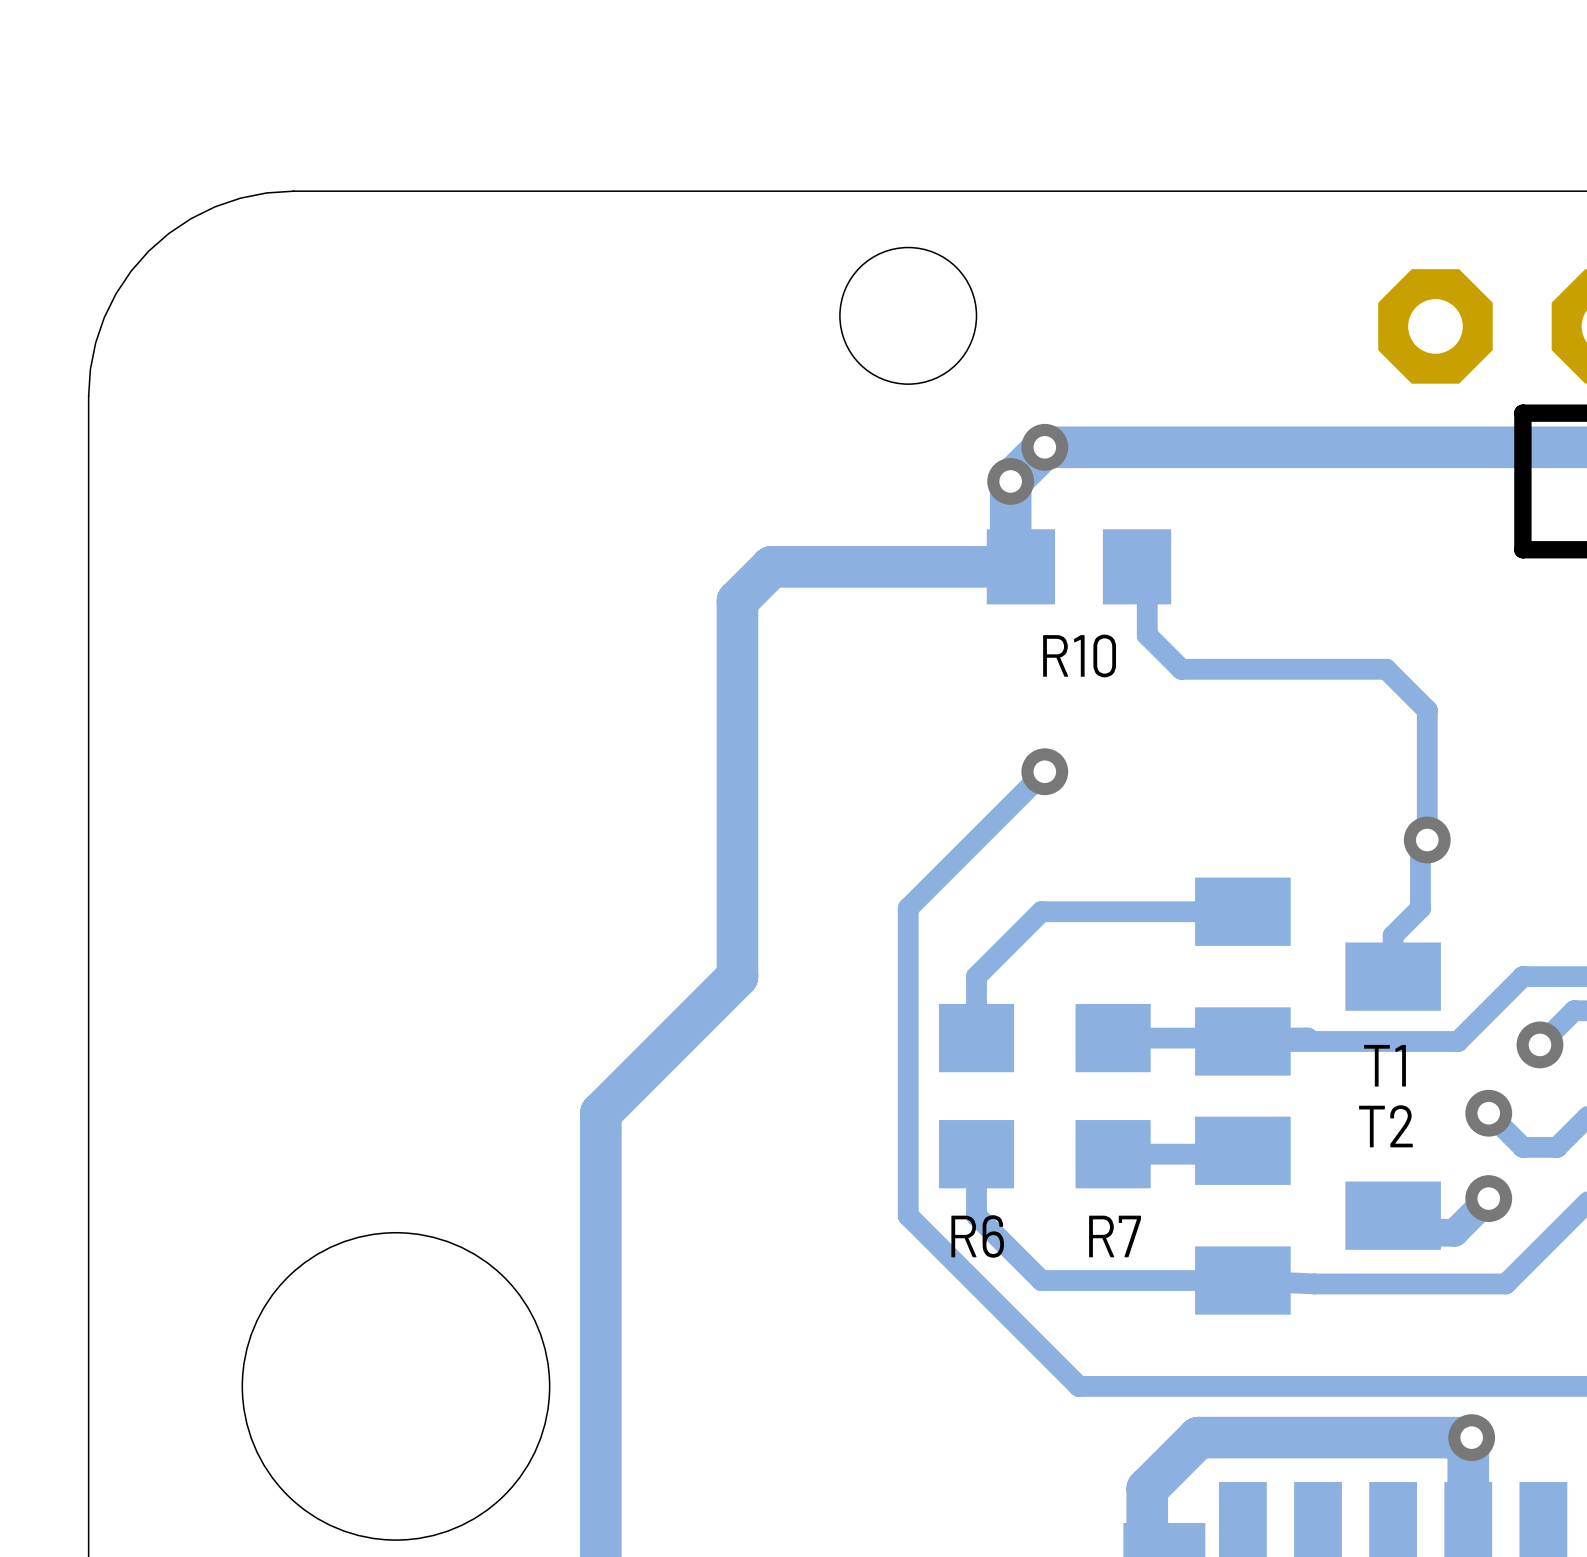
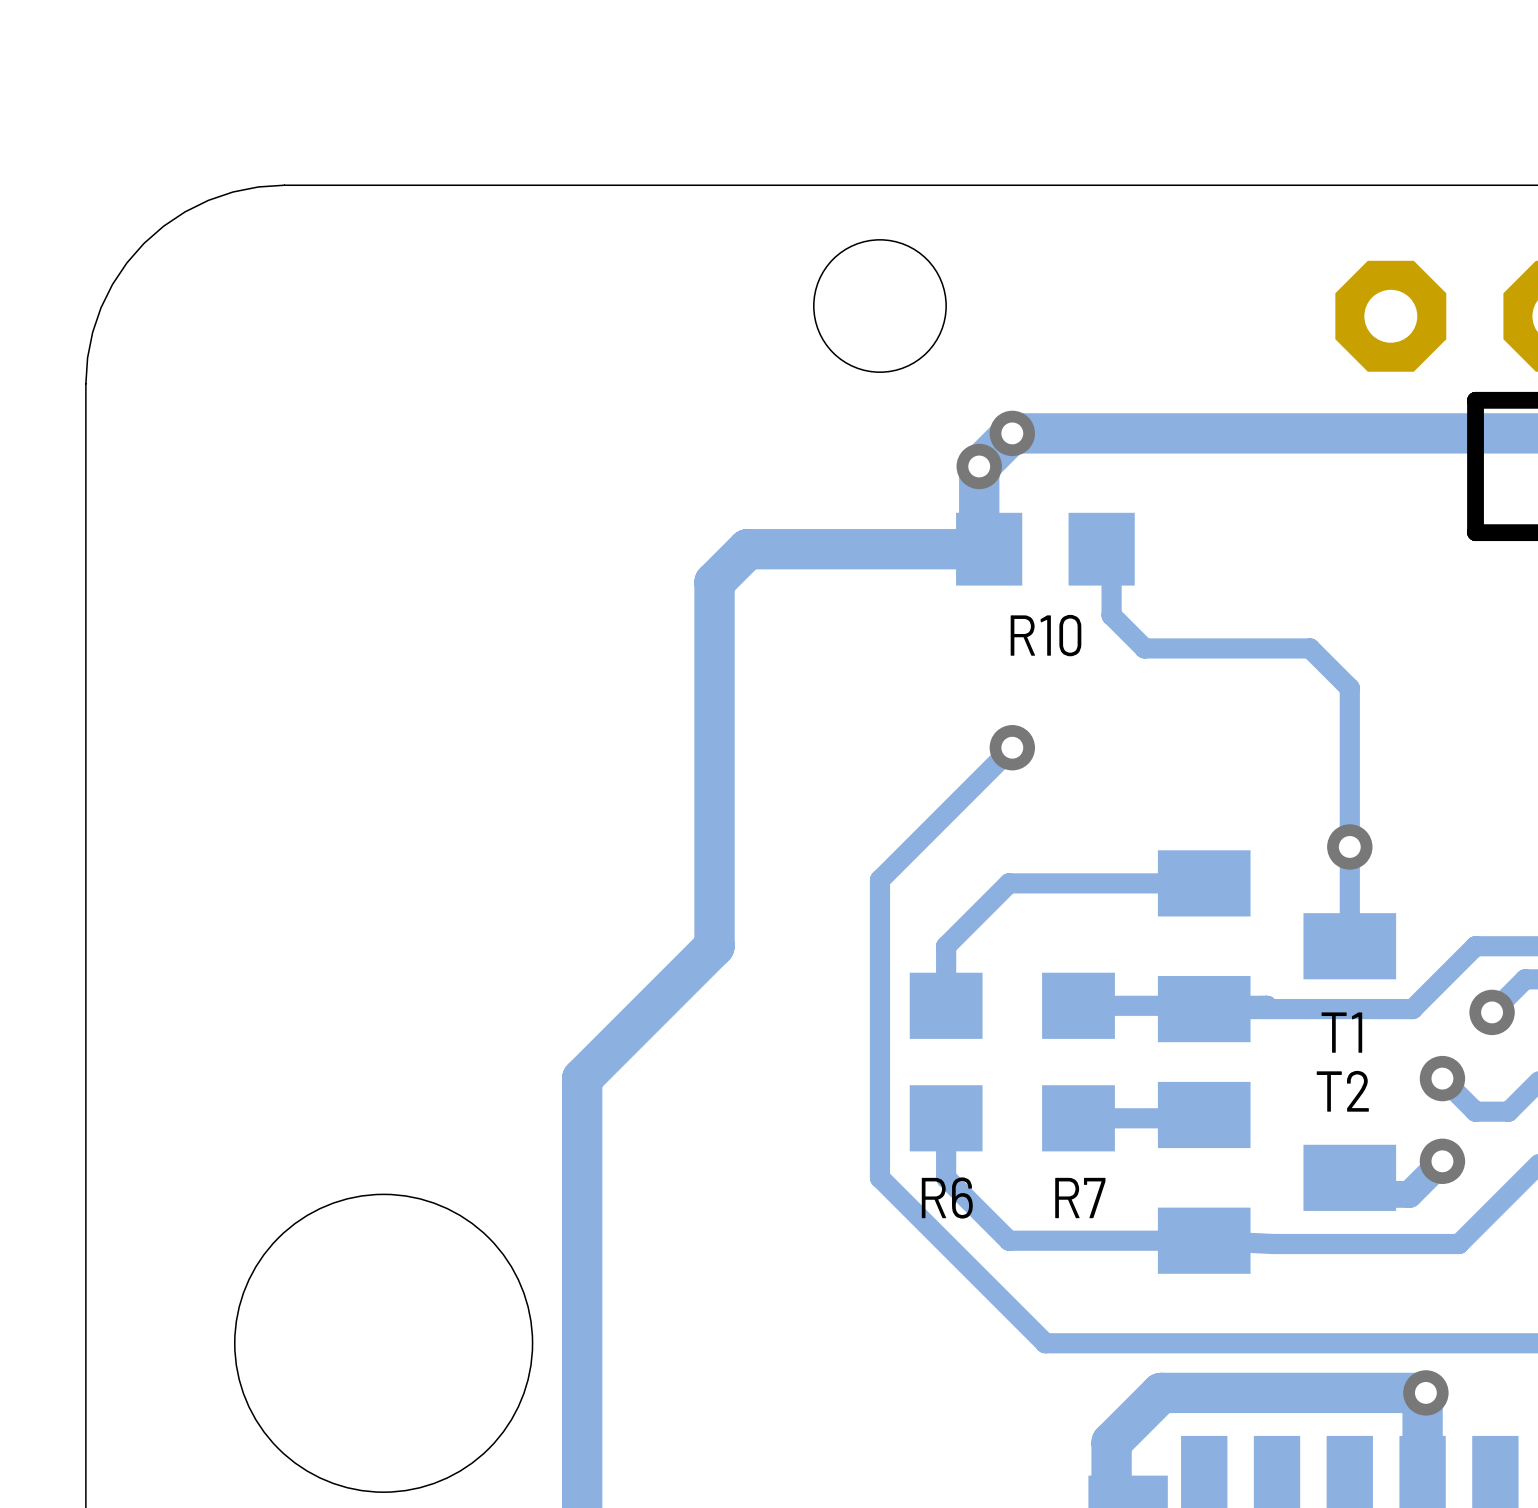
track: (1352, 669) (1386, 669) (1427, 710) (1427, 840) (1420, 846) (1420, 908) (1393, 935) -> (1310, 648) (1349, 688) (1349, 906)
via position: (1427, 840) -> (1349, 846)

